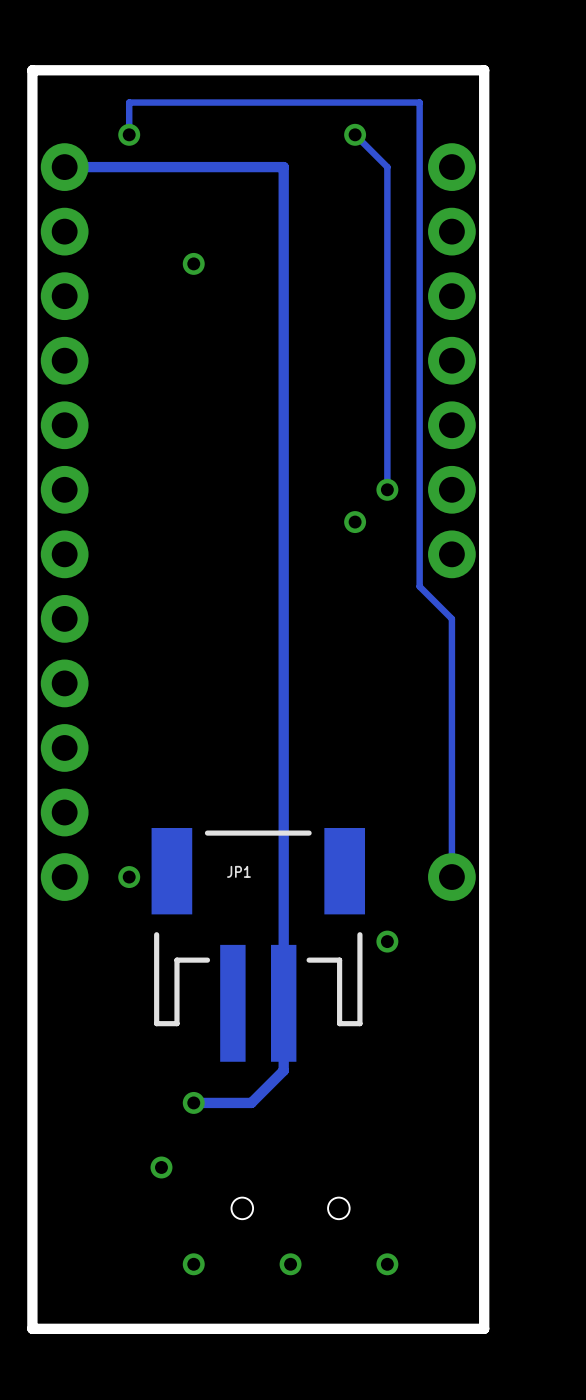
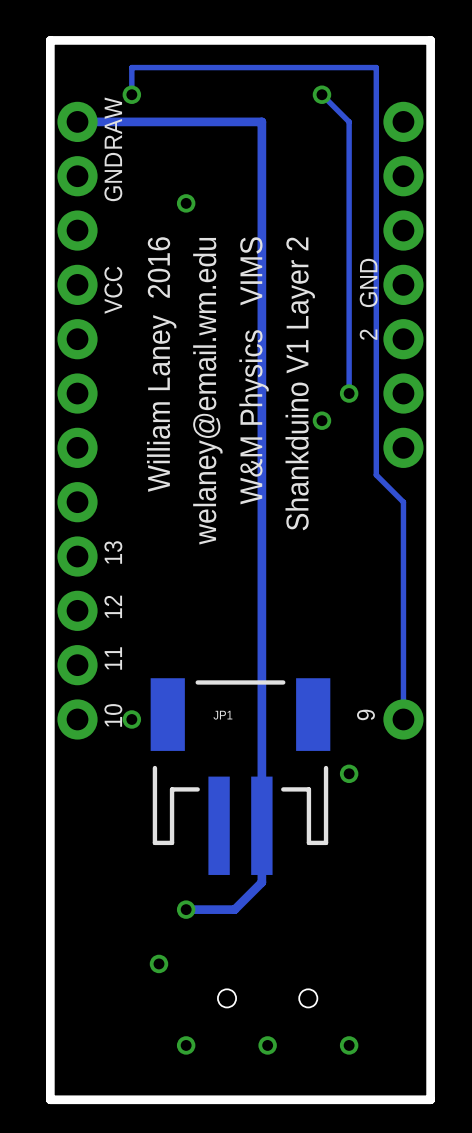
text: none -> RAW (113, 123)
text: none -> GND (113, 177)
text: none -> GND (368, 282)
text: none -> VCC (113, 290)
text: none -> 2 (368, 334)
text: none -> W&M Physics VIMS (254, 370)
text: none -> William Laney 2016 (161, 364)
text: none -> welaney@email.wm.edu (207, 391)
text: none -> Shankduino V1 Layer 2 (300, 383)
text: none -> 13 (113, 552)
text: none -> 12 (113, 606)
text: none -> 11 (113, 658)
text: none -> 9 (365, 714)
text: none -> 10 (113, 715)

